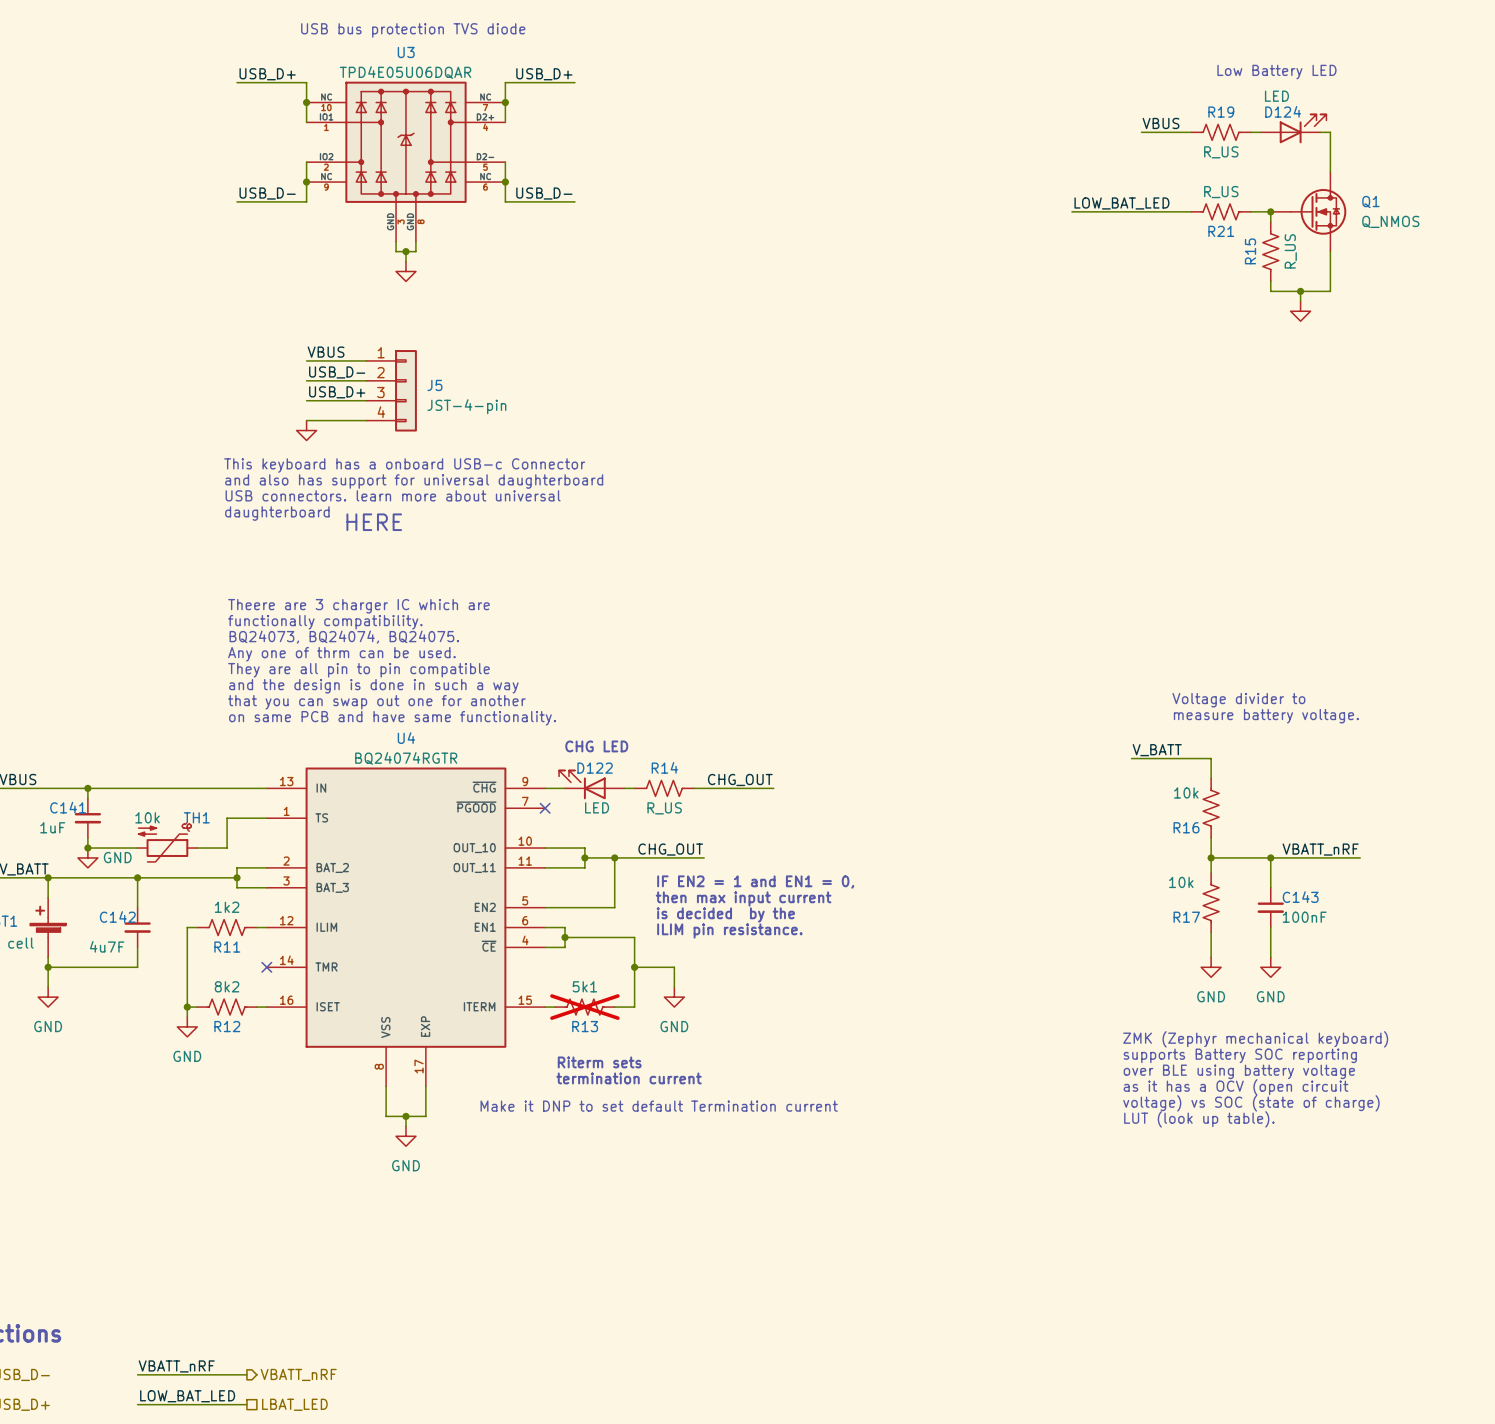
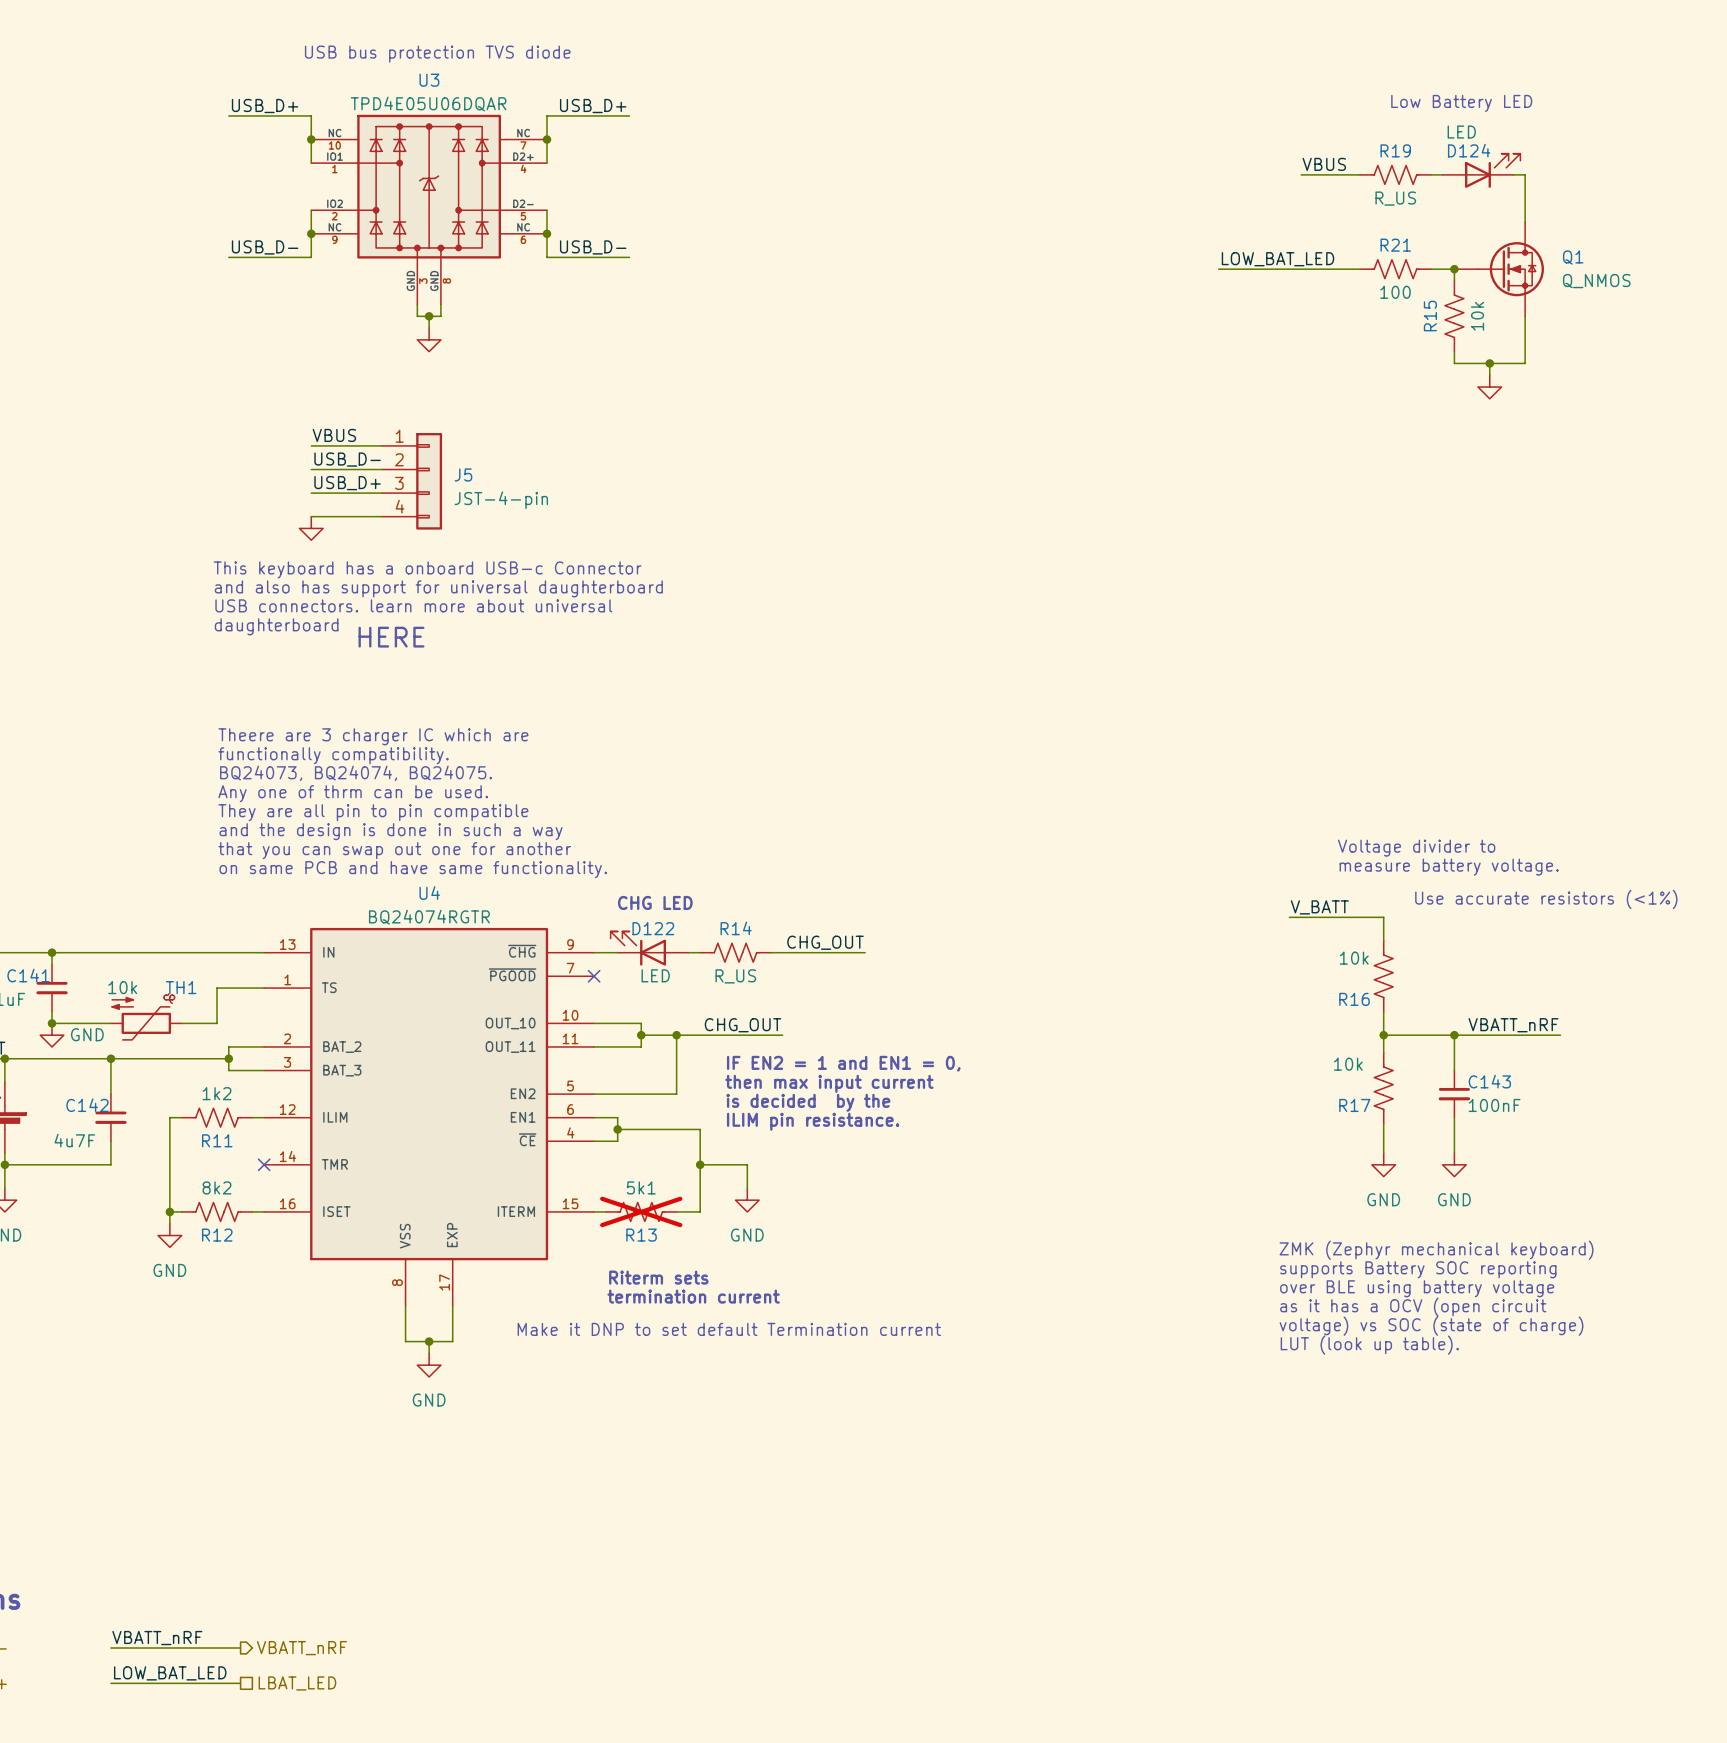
R21 value: R_US (1221, 192) -> 100 (1395, 292)
R21 name position: R21 (1221, 231) -> R21 (1395, 245)
R15 value: R_US (1290, 251) -> 10k (1477, 316)
text: none -> Use accurate resistors (<1%) (1546, 899)

